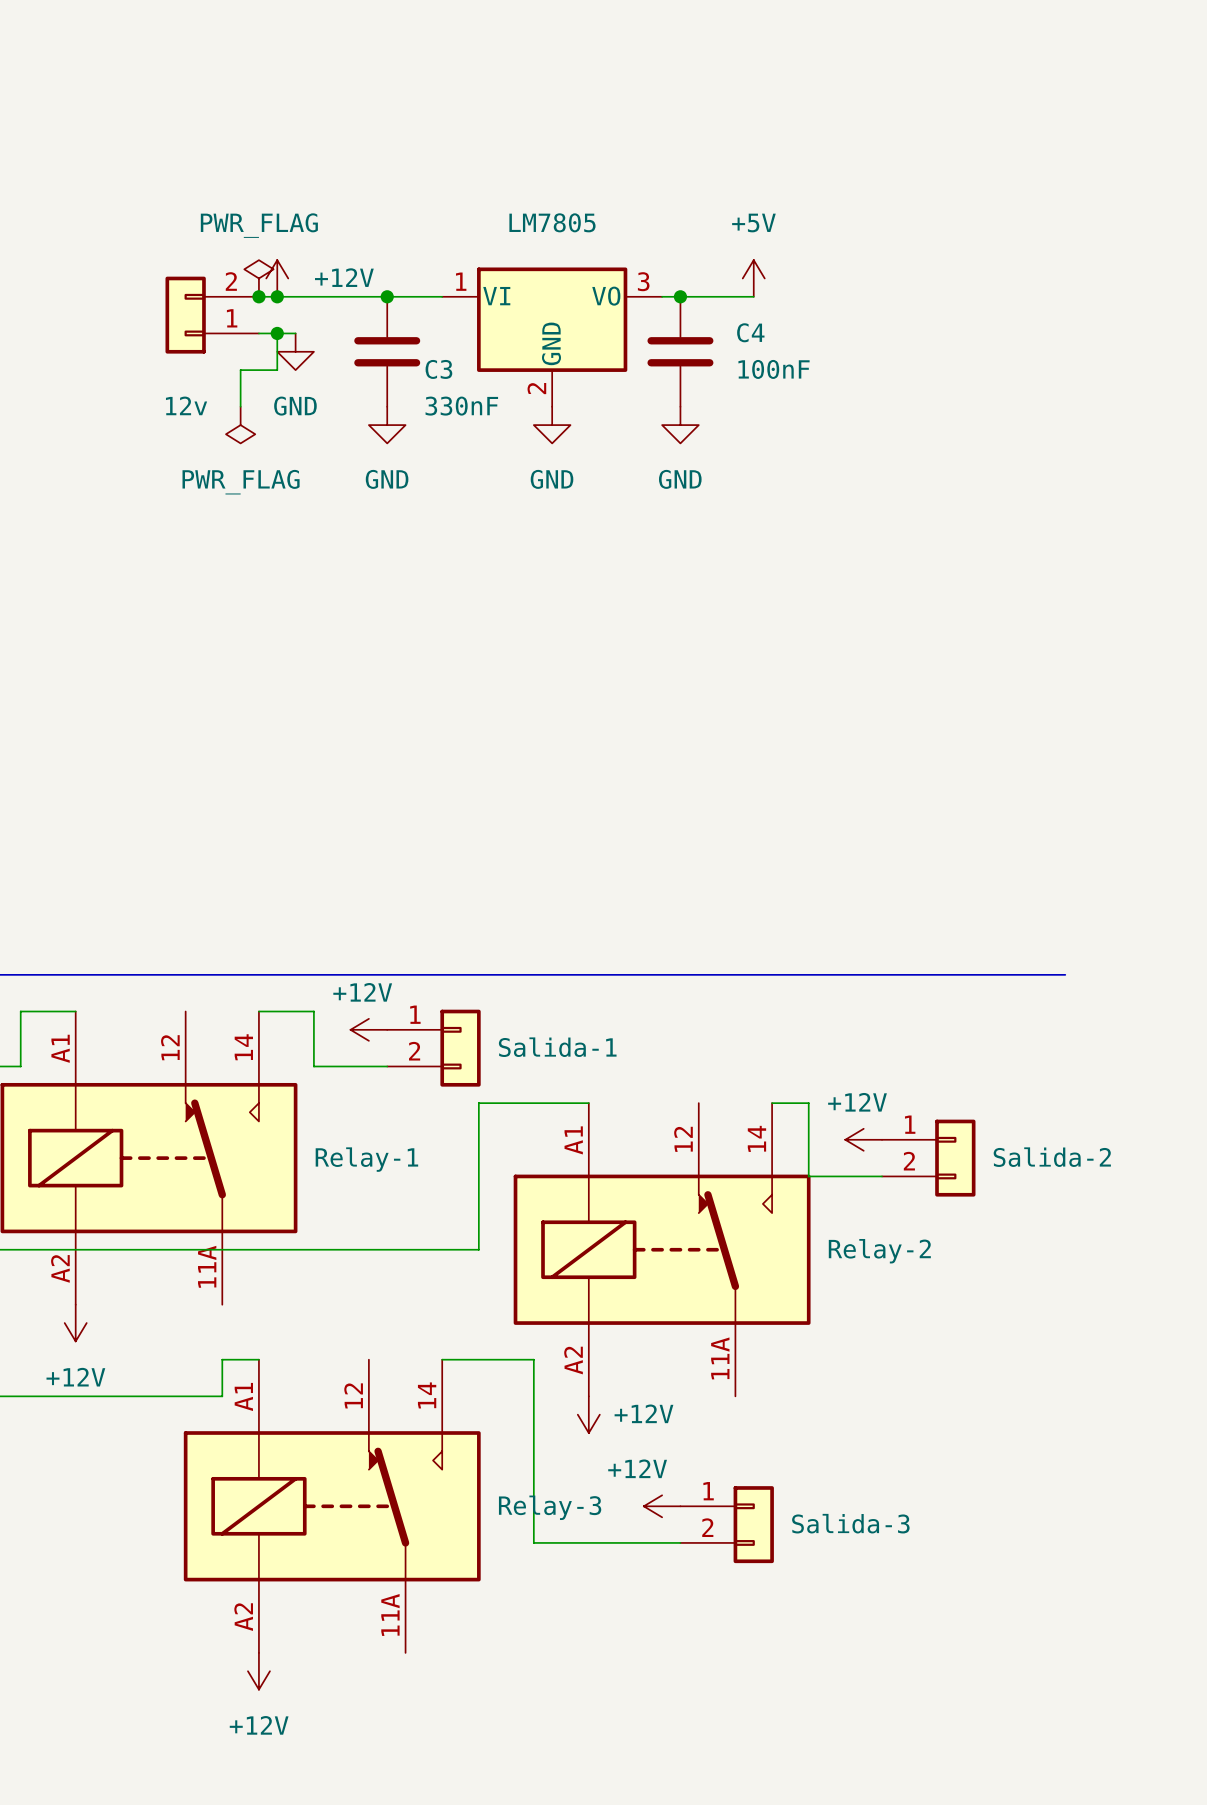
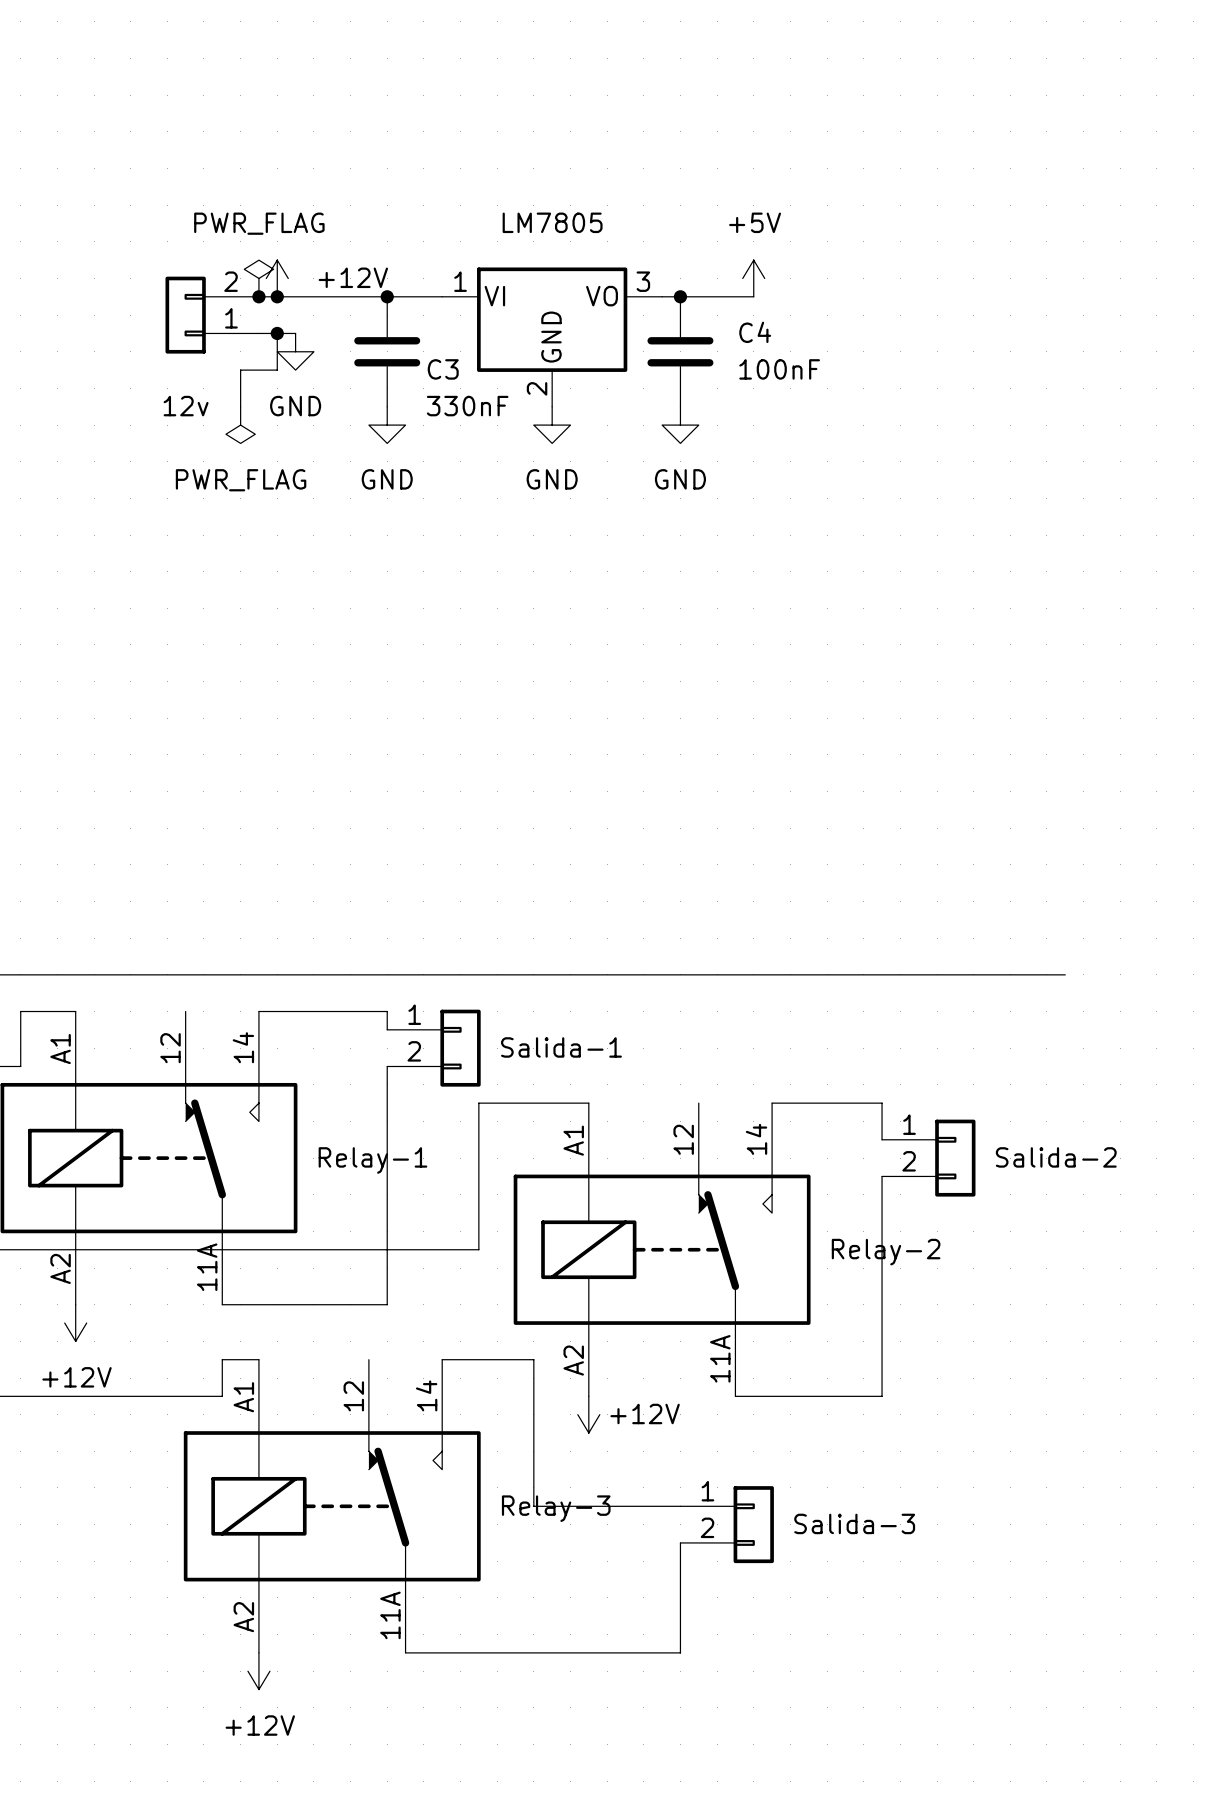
wire: (313, 1011) (313, 1066) (387, 1066) -> (313, 1011) (387, 1011) (387, 1029)
power symbol: +12V (368, 1029) -> none
wire: none -> (387, 1066) (387, 1304) (222, 1304)
wire: (808, 1103) (808, 1176) (882, 1176) -> (808, 1103) (882, 1103) (882, 1139)
power symbol: +12V (863, 1139) -> none
wire: none -> (882, 1176) (882, 1396) (735, 1396)
wire: (533, 1506) (533, 1542) (680, 1542) -> (533, 1506) (680, 1506)
power symbol: +12V (662, 1506) -> none
wire: none -> (680, 1542) (680, 1652) (405, 1652)

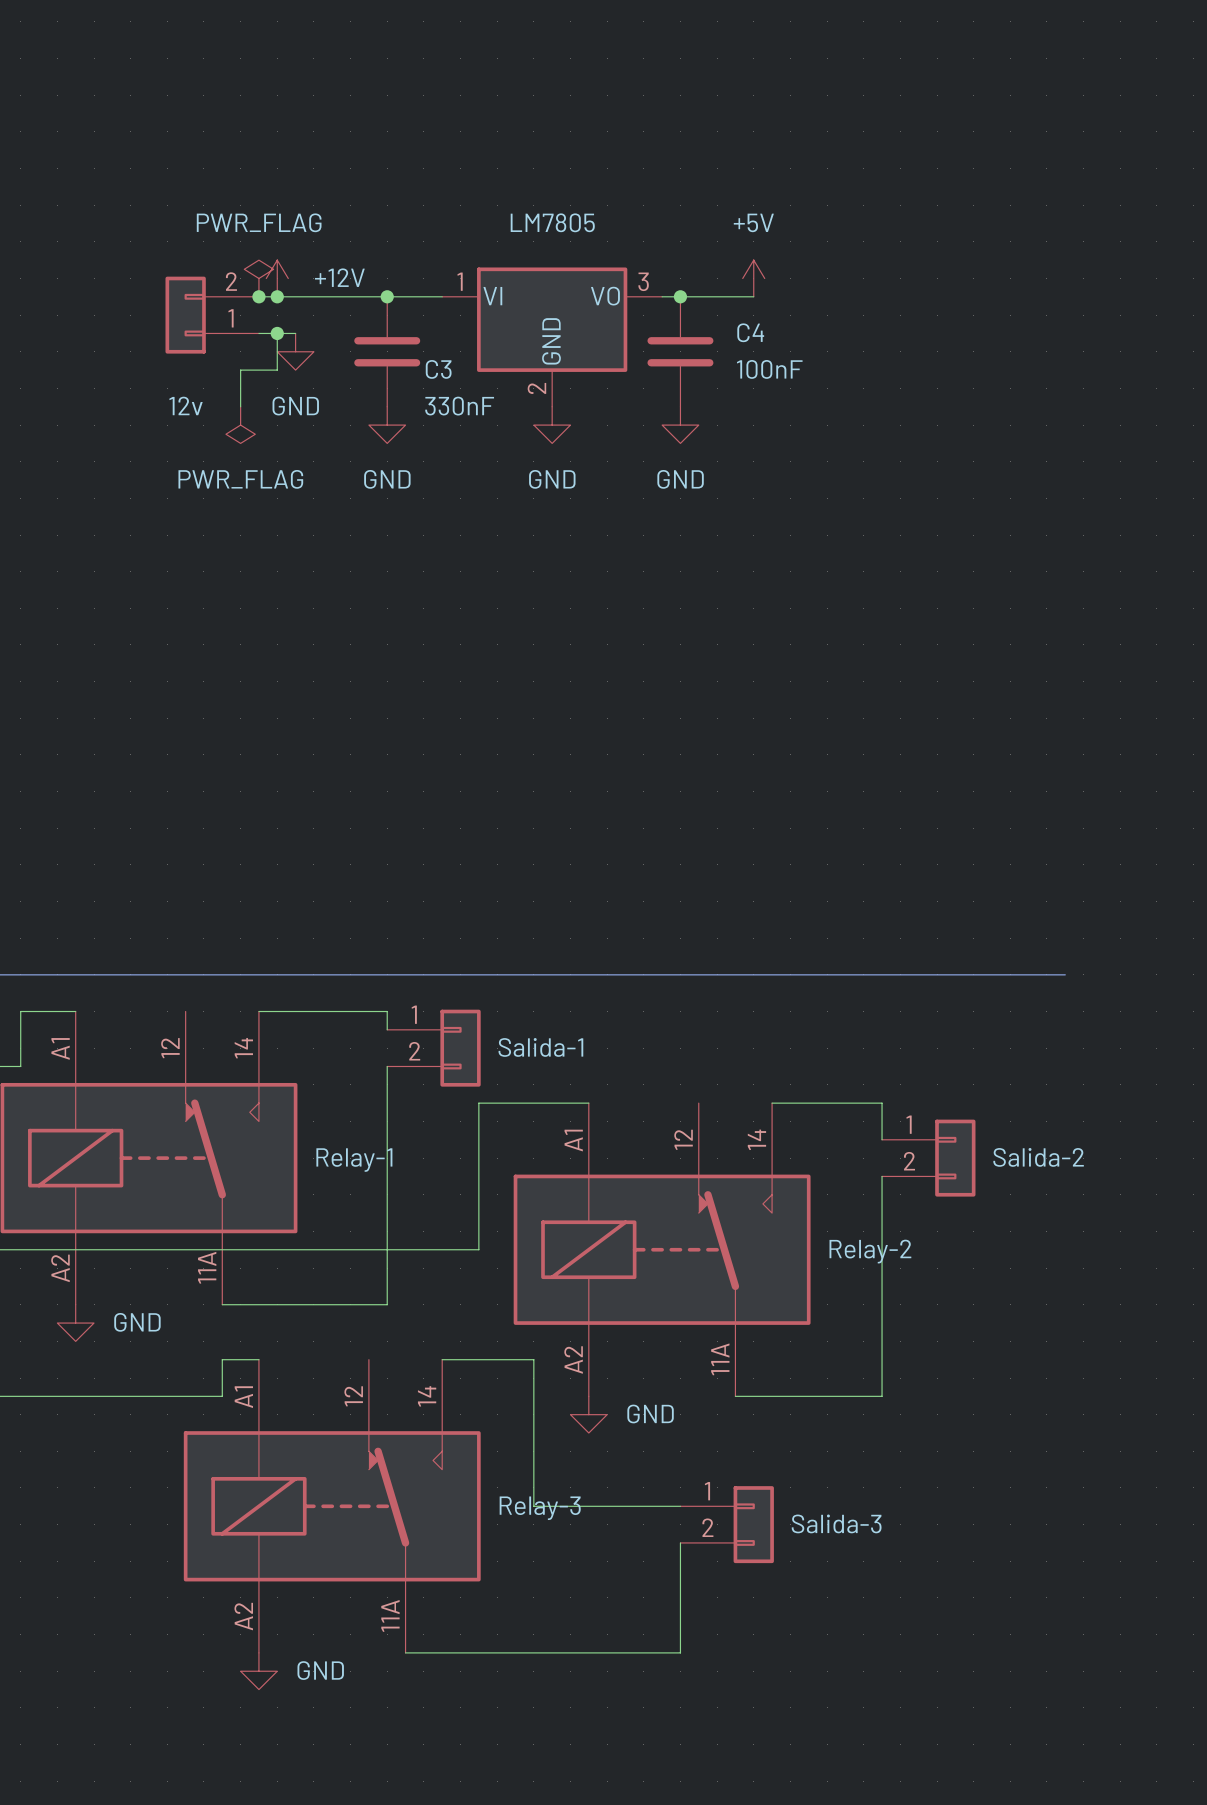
power symbol: +12V (75, 1323) -> GND (75, 1323)
power symbol: +12V (588, 1414) -> GND (588, 1414)
power symbol: +12V (258, 1671) -> GND (258, 1671)

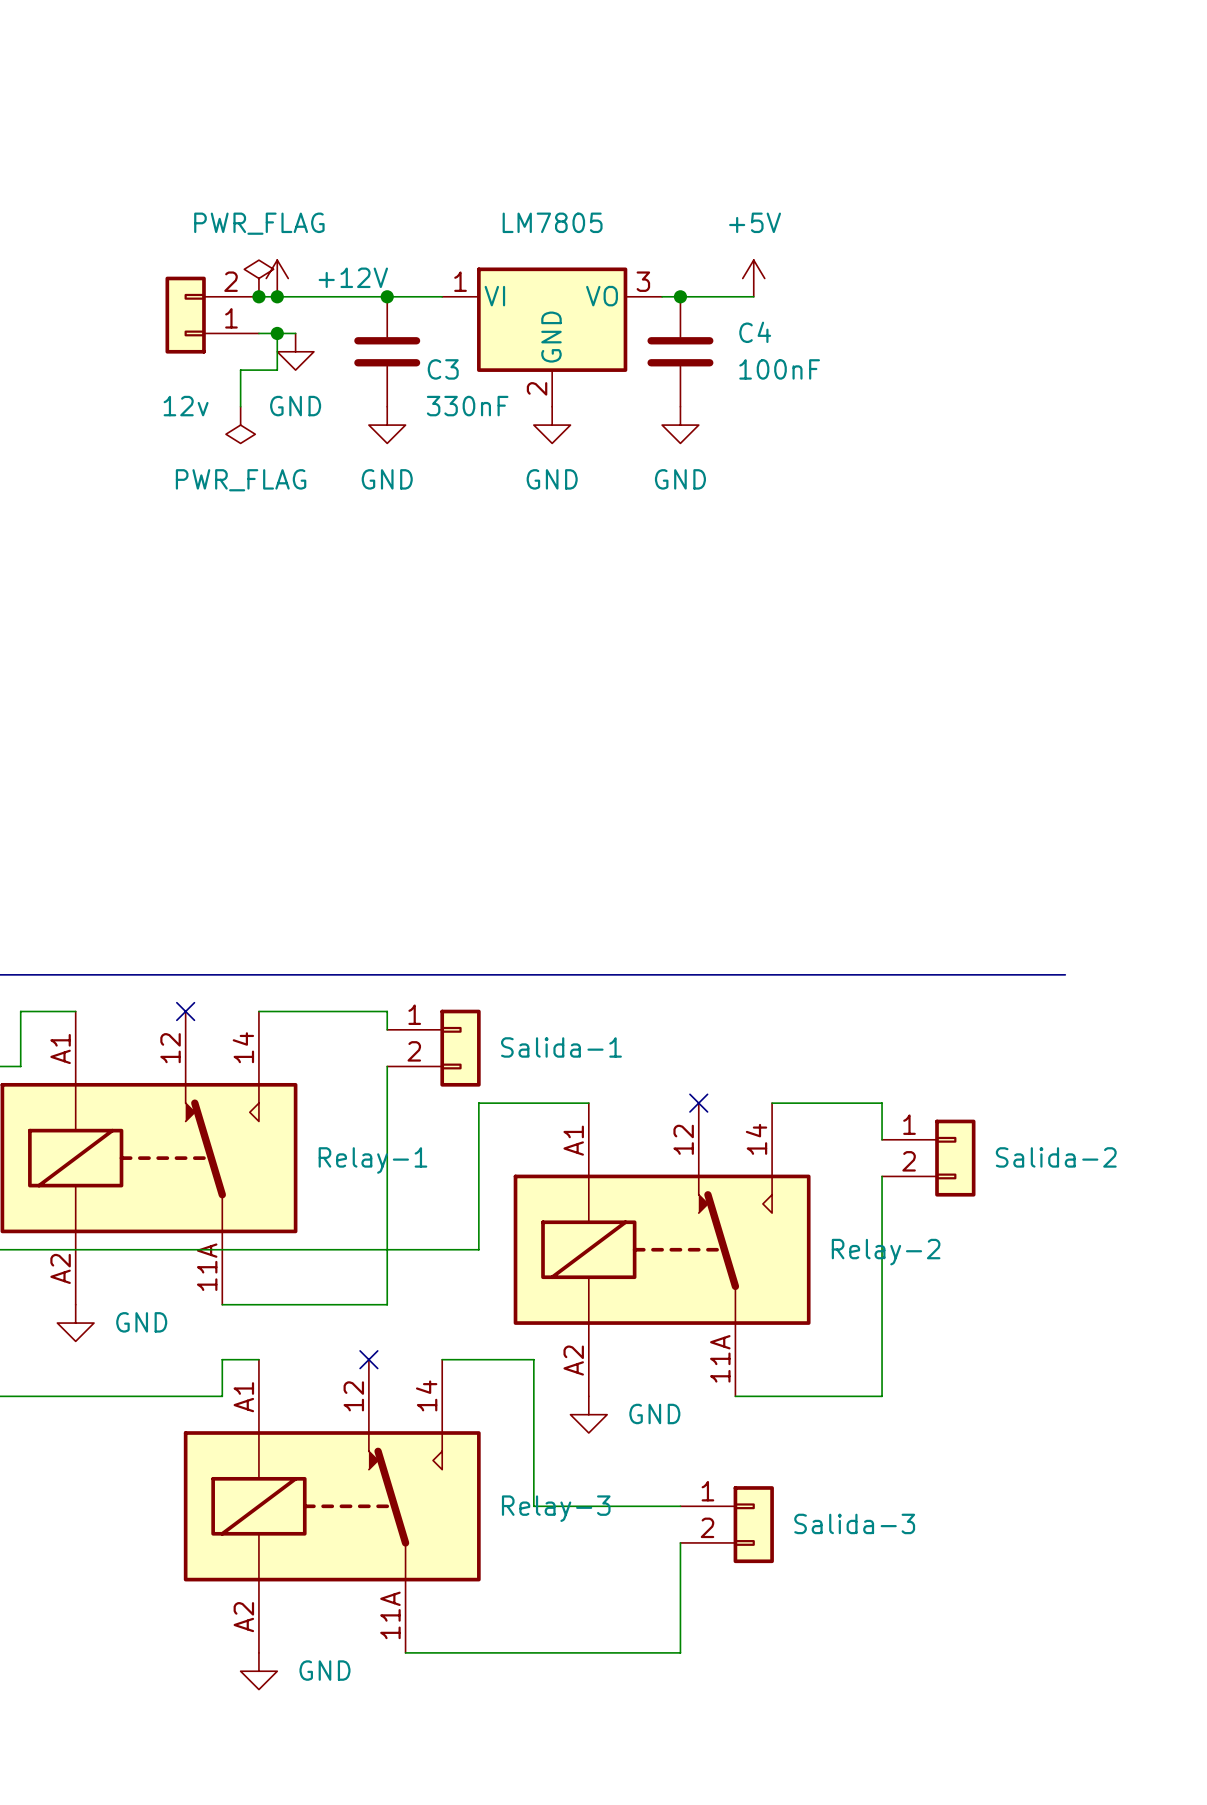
no-connect mark: none -> (185, 1011)
no-connect mark: none -> (698, 1103)
no-connect mark: none -> (368, 1359)

